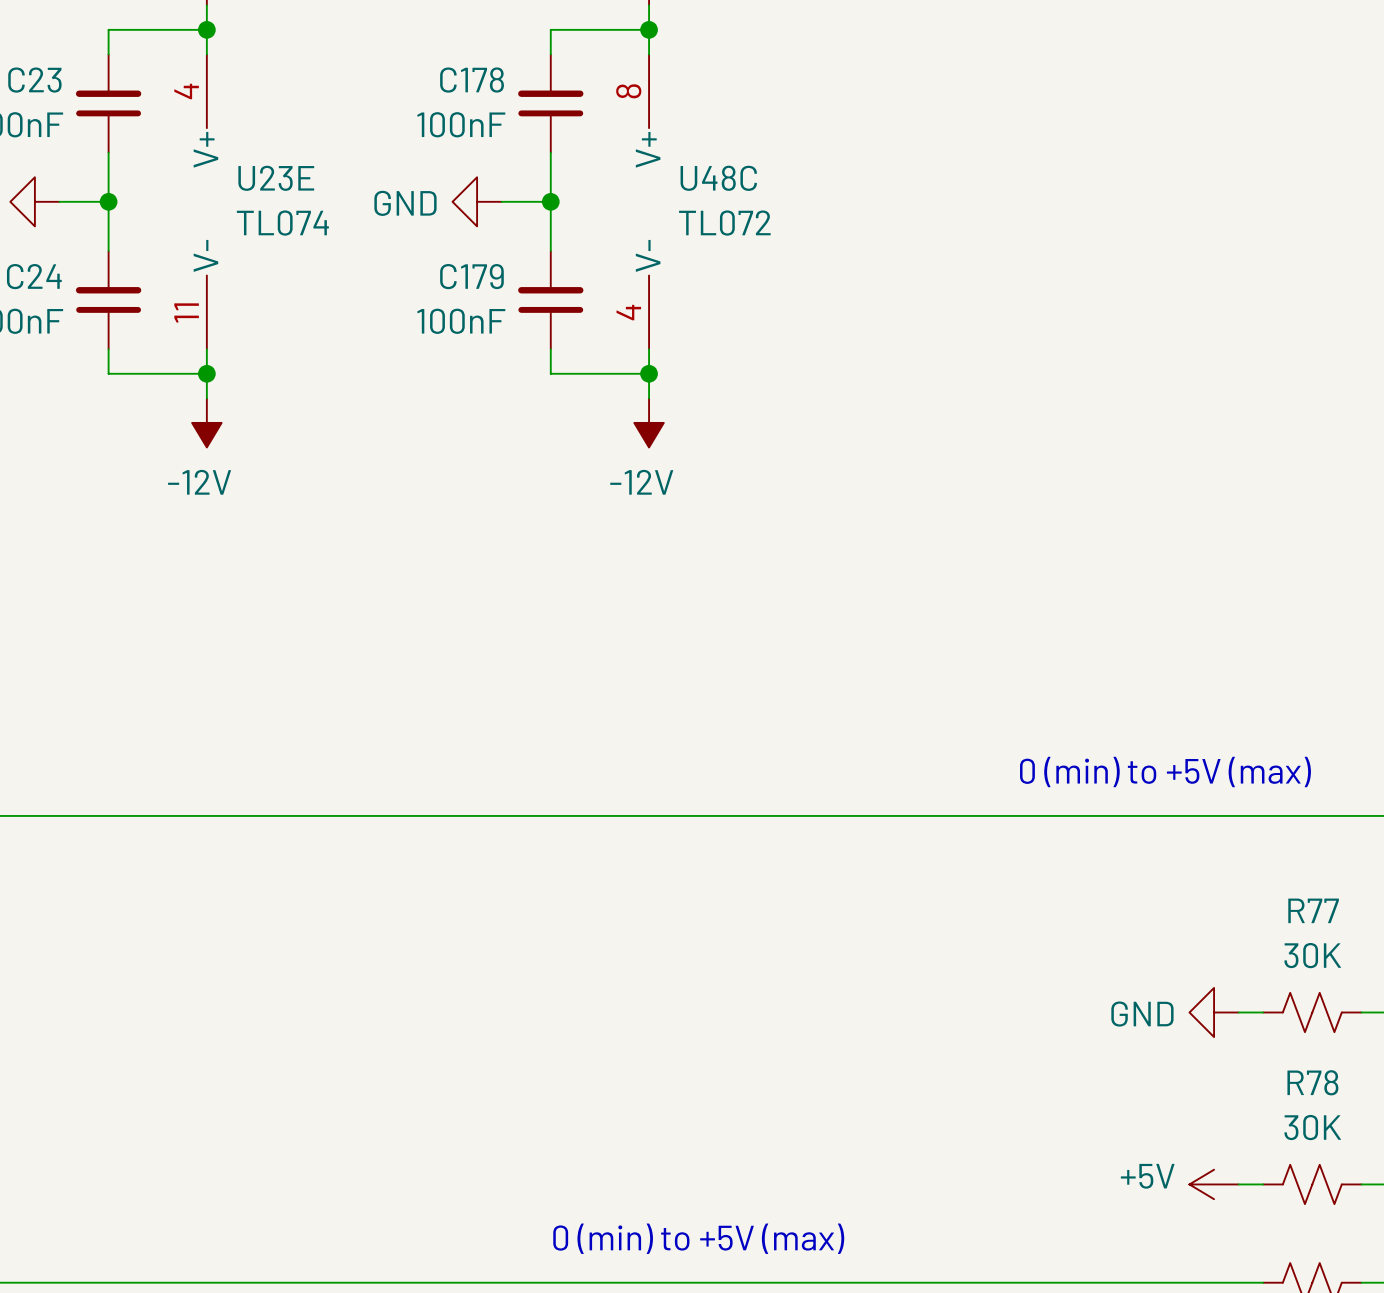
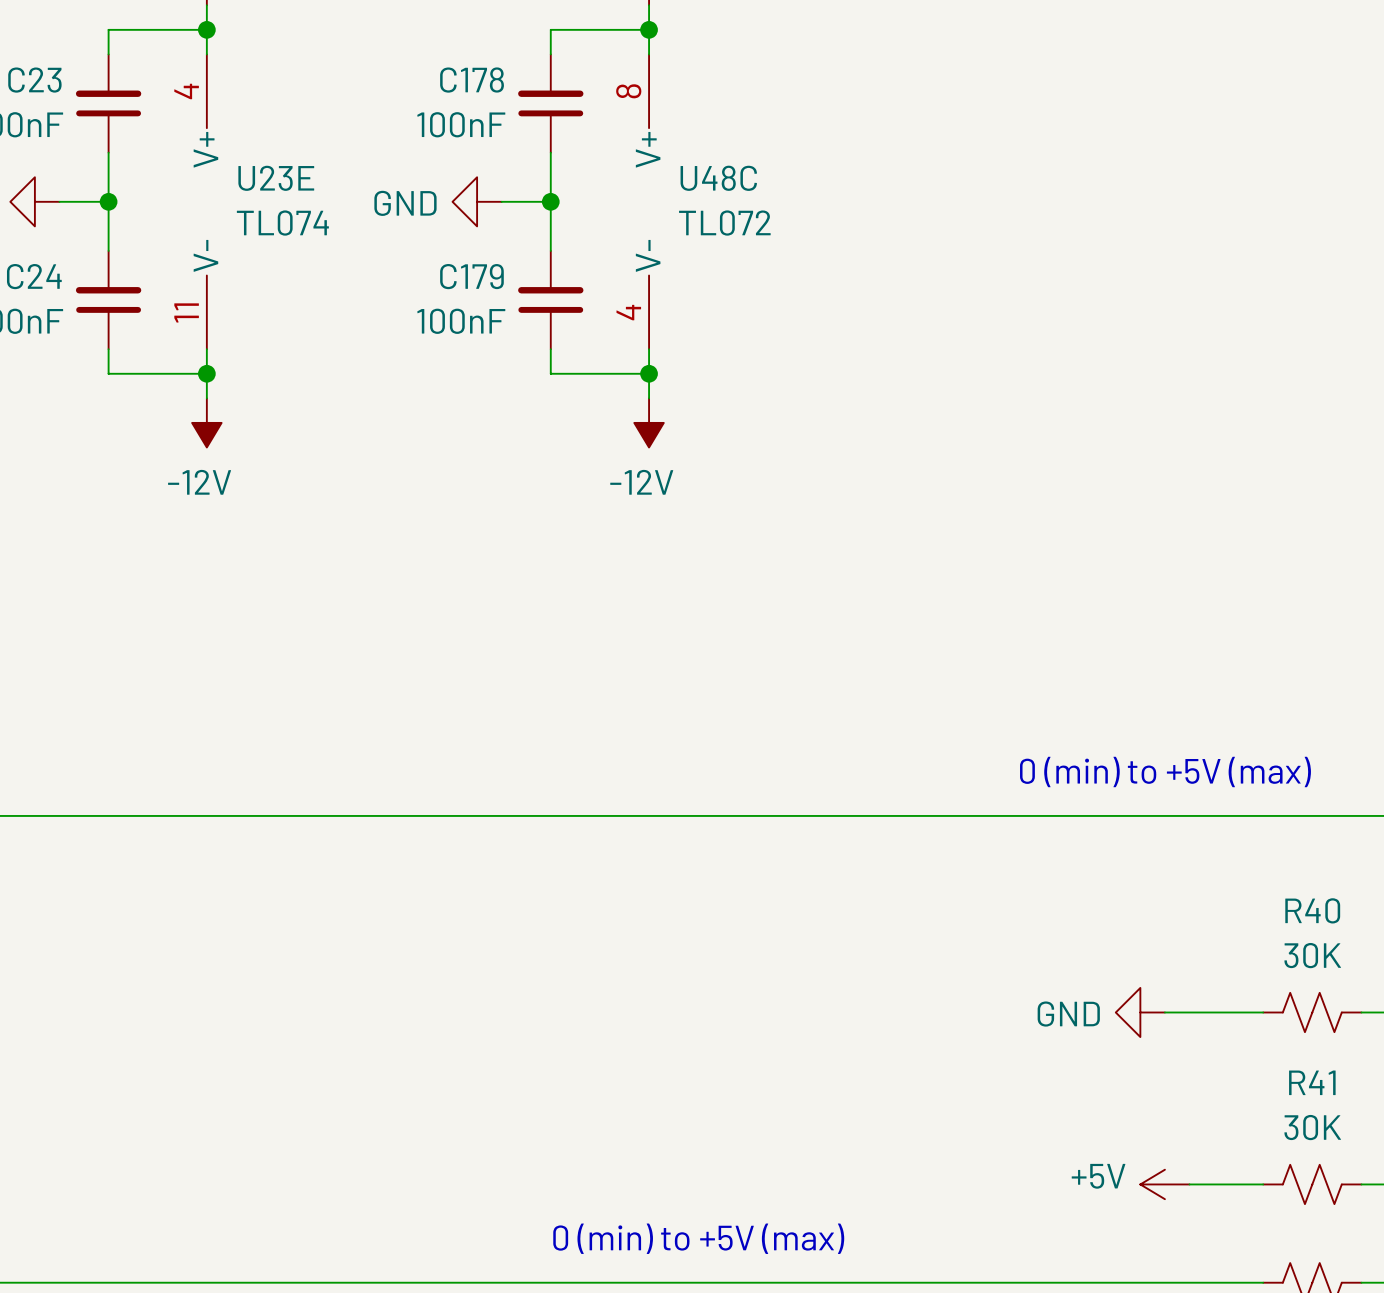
R77 name: R77 (1313, 910) -> R40 (1312, 910)
wire: none -> (1164, 1012) (1238, 1012)
power symbol position: GND (1214, 1012) -> GND (1140, 1012)
R78 name: R78 (1312, 1082) -> R41 (1312, 1082)
power symbol position: +5V (1214, 1184) -> +5V (1164, 1184)

